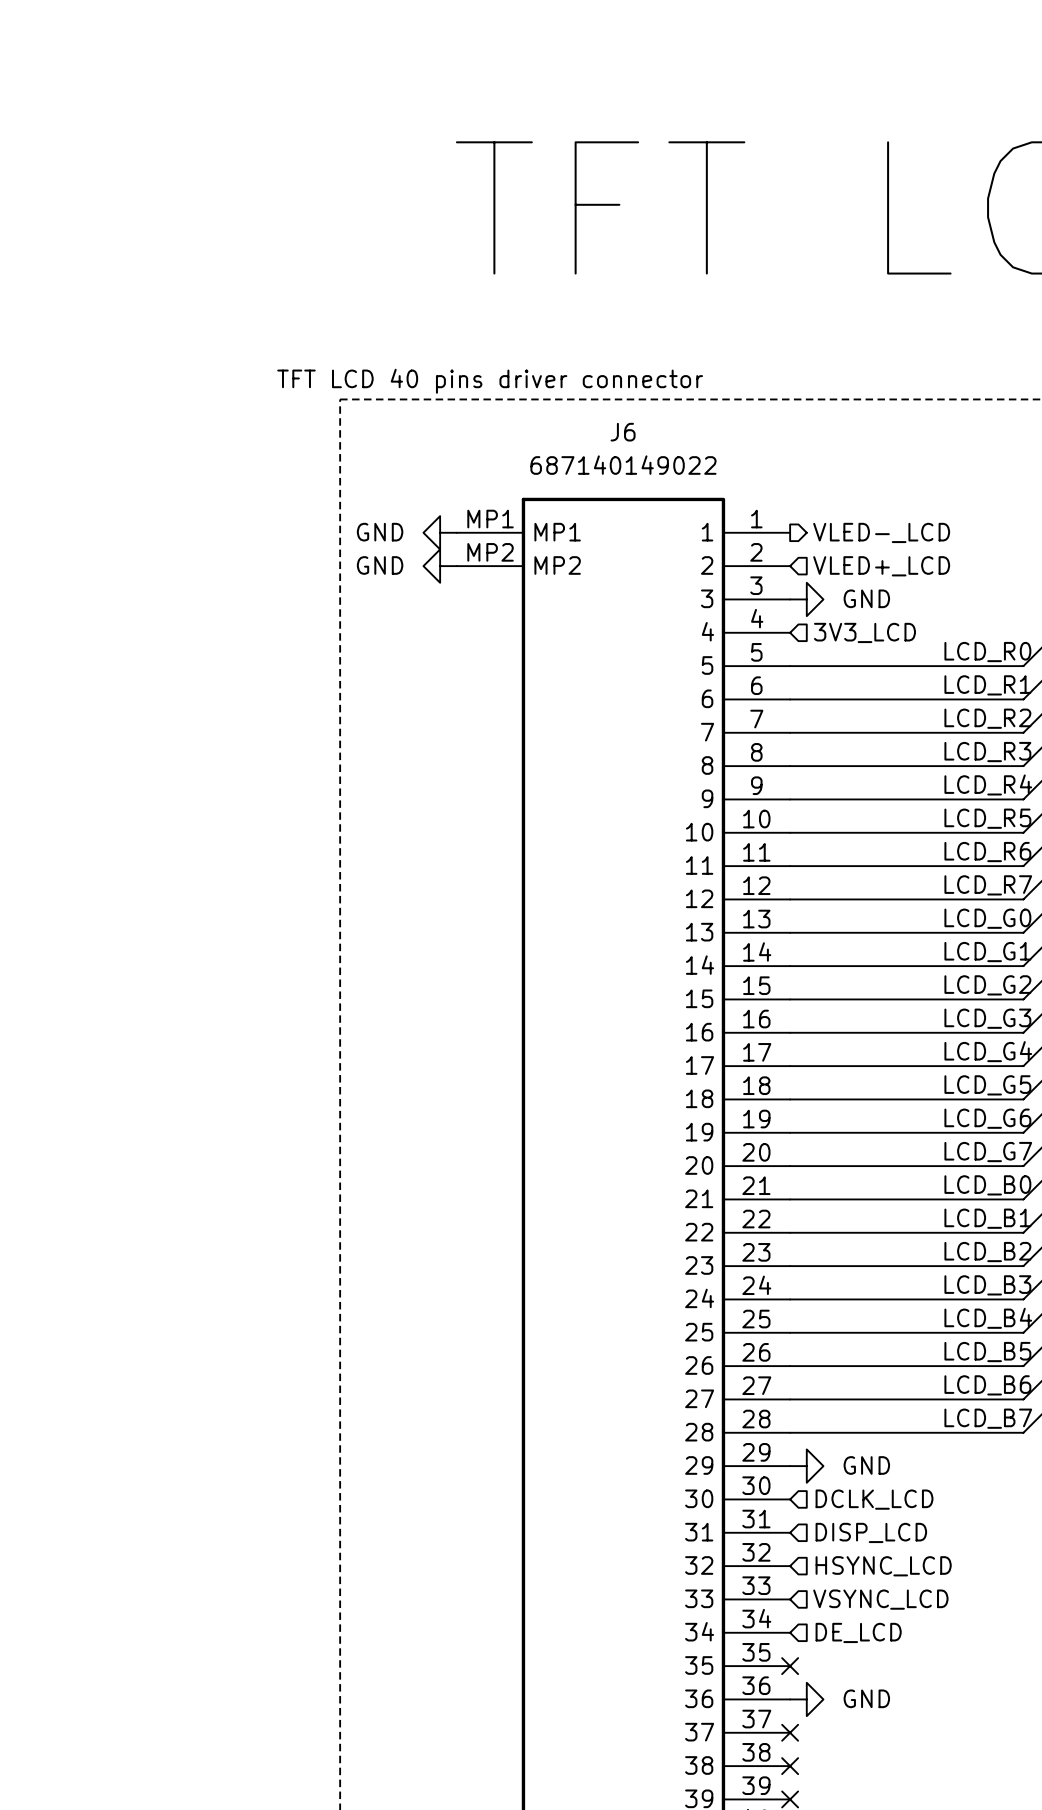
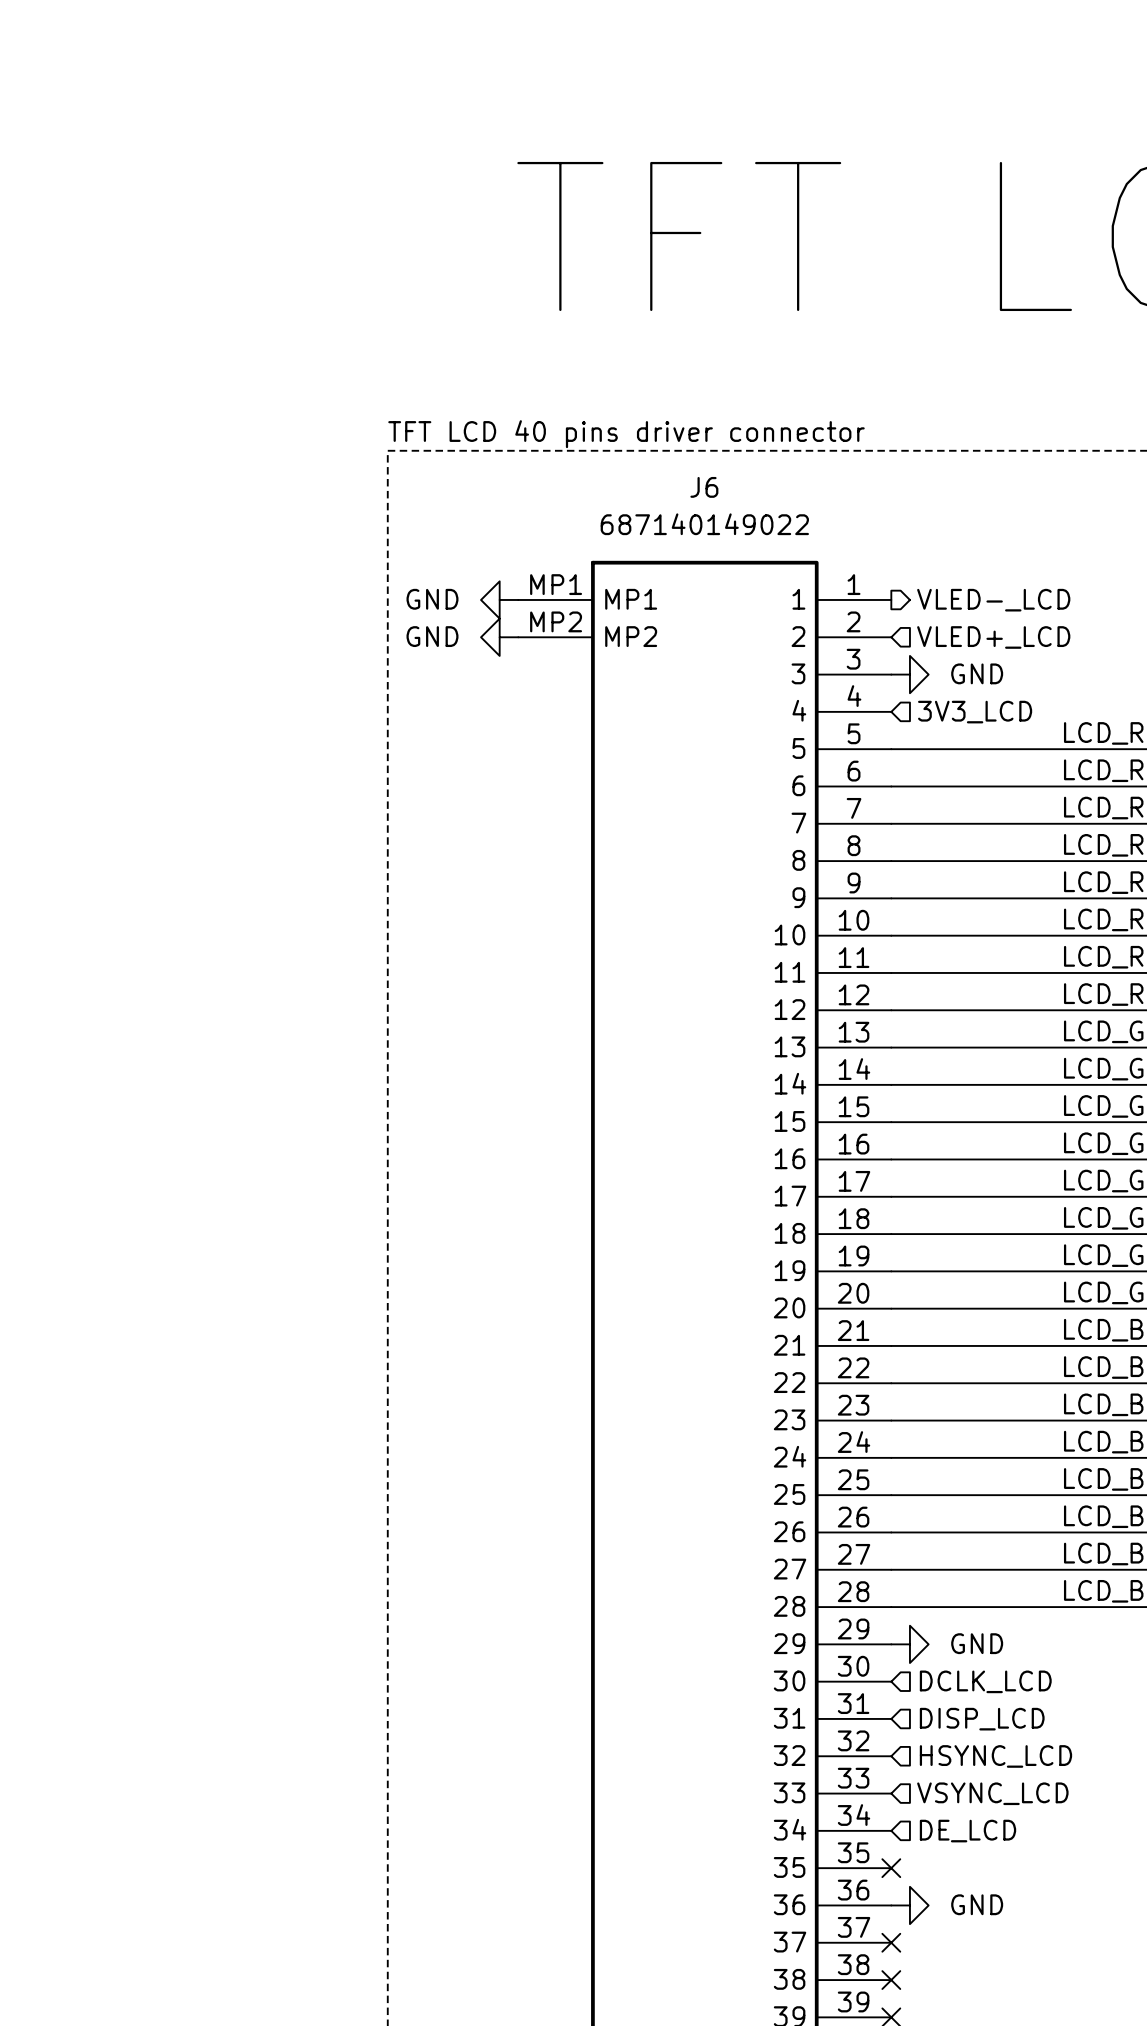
text position: TFT LCD 40 pins driver connector (490, 381) -> TFT LCD 40 pins driver connector (626, 434)

